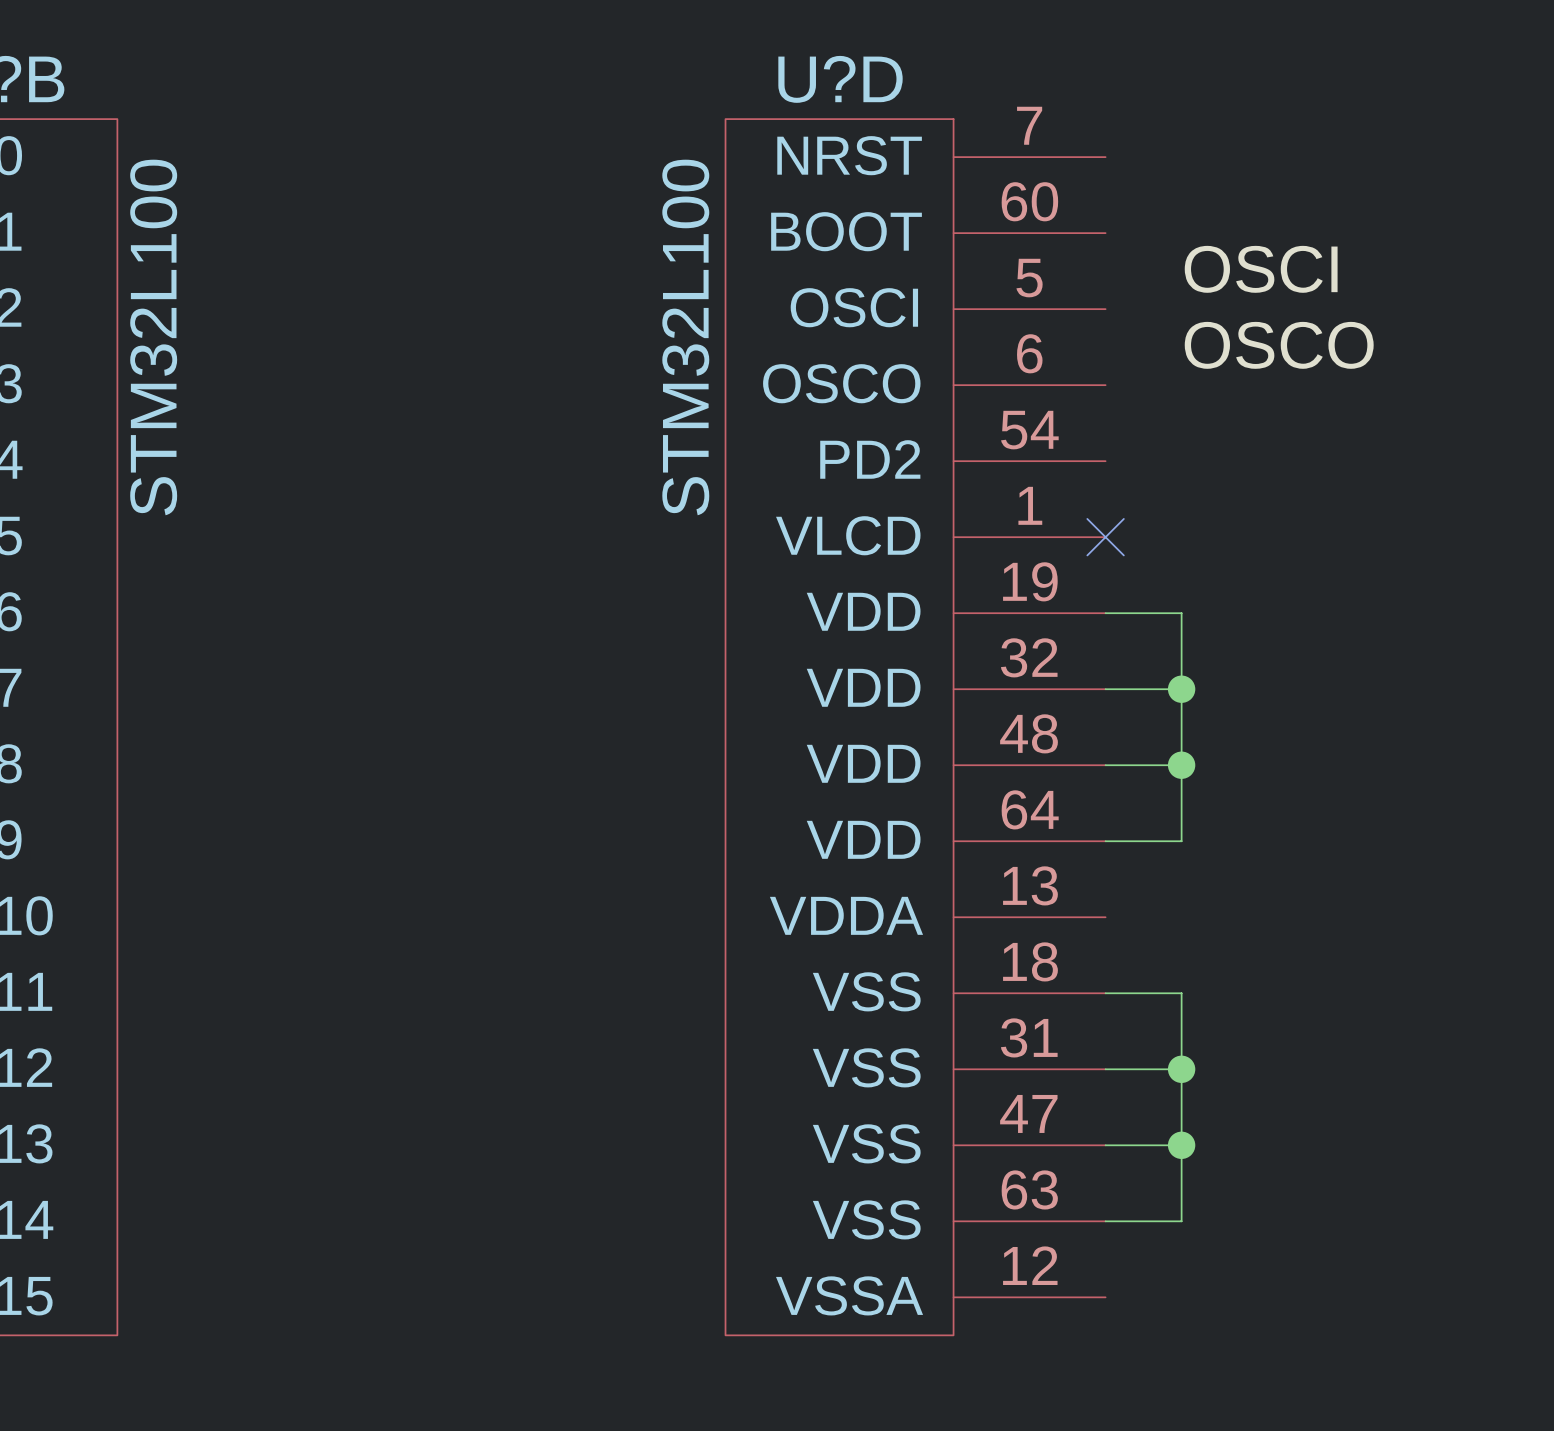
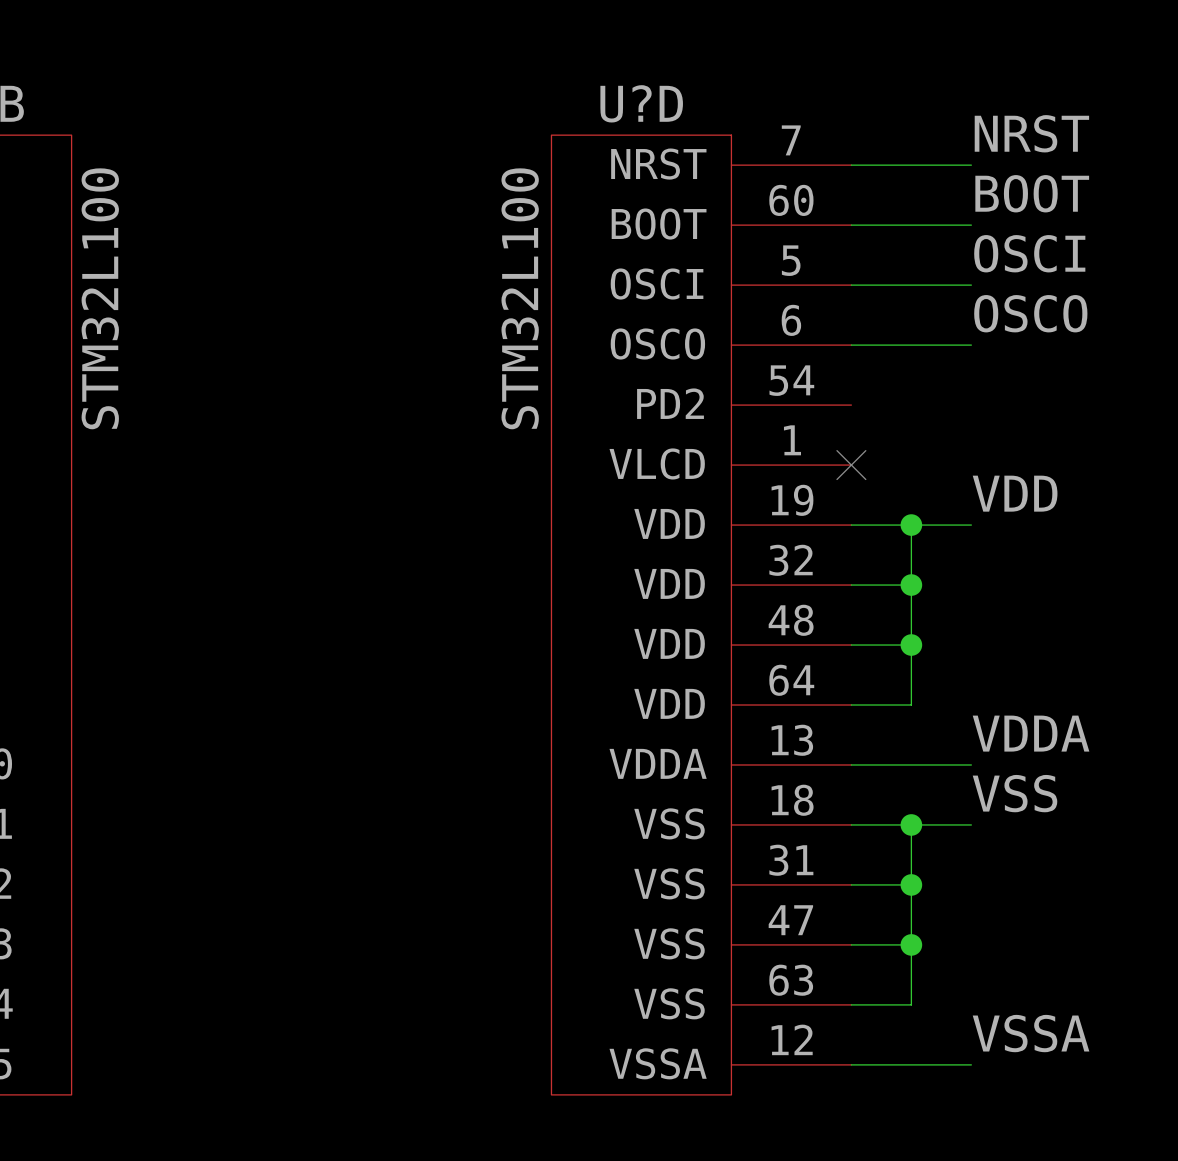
label: none -> NRST (1031, 133)
wire: none -> (851, 165) (971, 165)
label: none -> BOOT (1032, 193)
wire: none -> (851, 225) (971, 225)
label position: OSCI (1261, 269) -> OSCI (1029, 253)
wire: none -> (851, 285) (971, 285)
label position: OSCO (1279, 345) -> OSCO (1030, 313)
wire: none -> (851, 345) (971, 345)
label: none -> VDD (1015, 493)
wire: none -> (911, 525) (971, 525)
junction: none -> (911, 525)
label: none -> VDDA (1031, 733)
wire: none -> (851, 764) (971, 764)
label: none -> VSS (1015, 793)
wire: none -> (911, 824) (971, 824)
junction: none -> (911, 824)
label: none -> VSSA (1031, 1033)
wire: none -> (851, 1064) (971, 1064)

